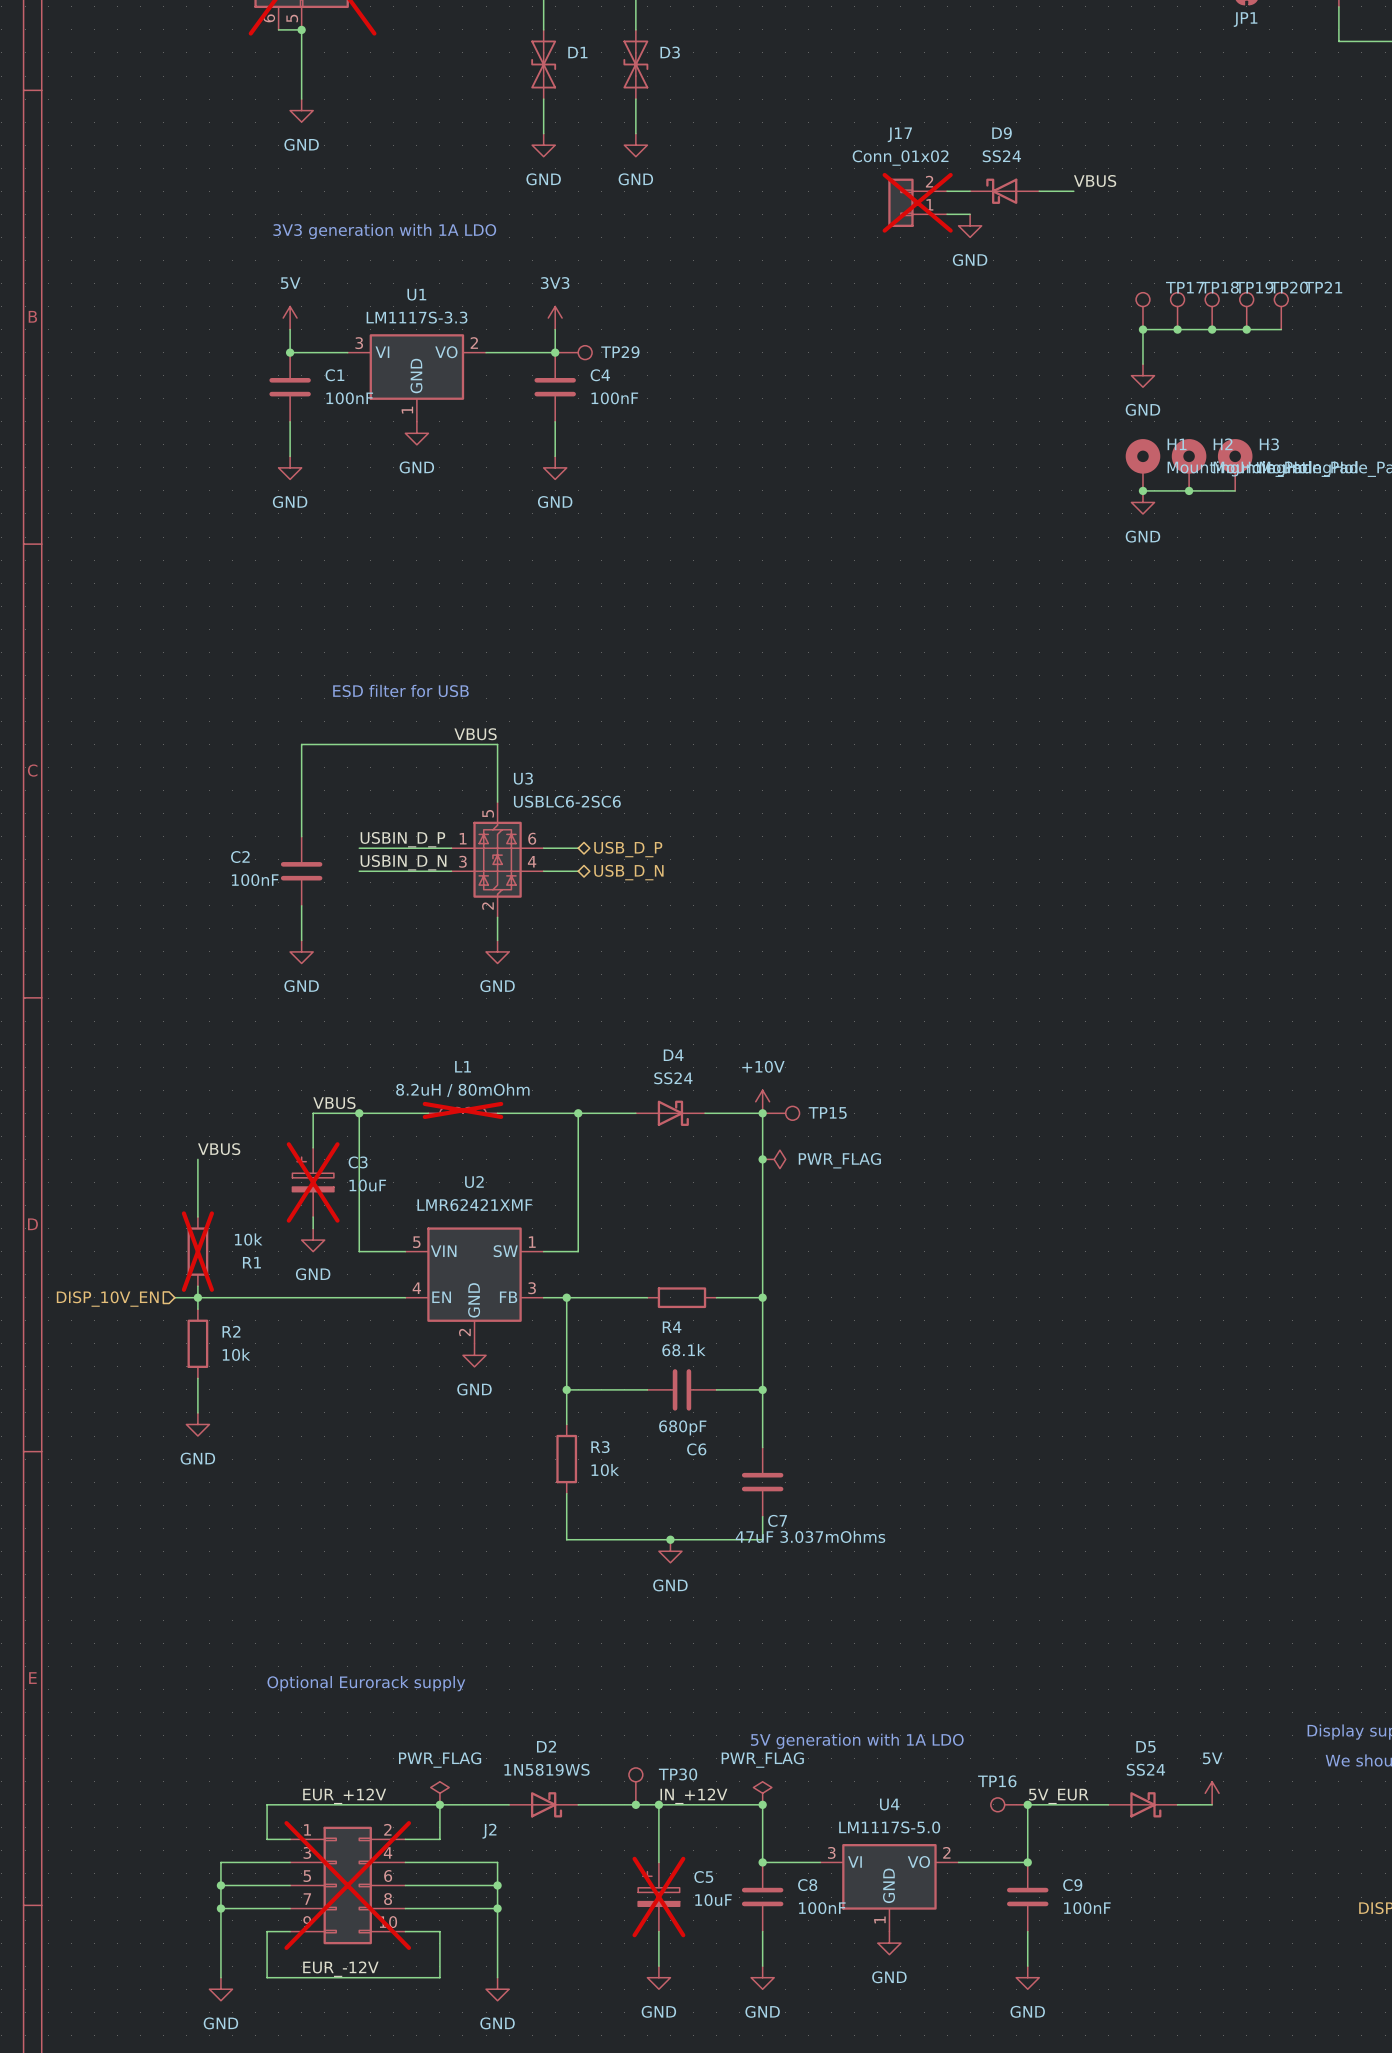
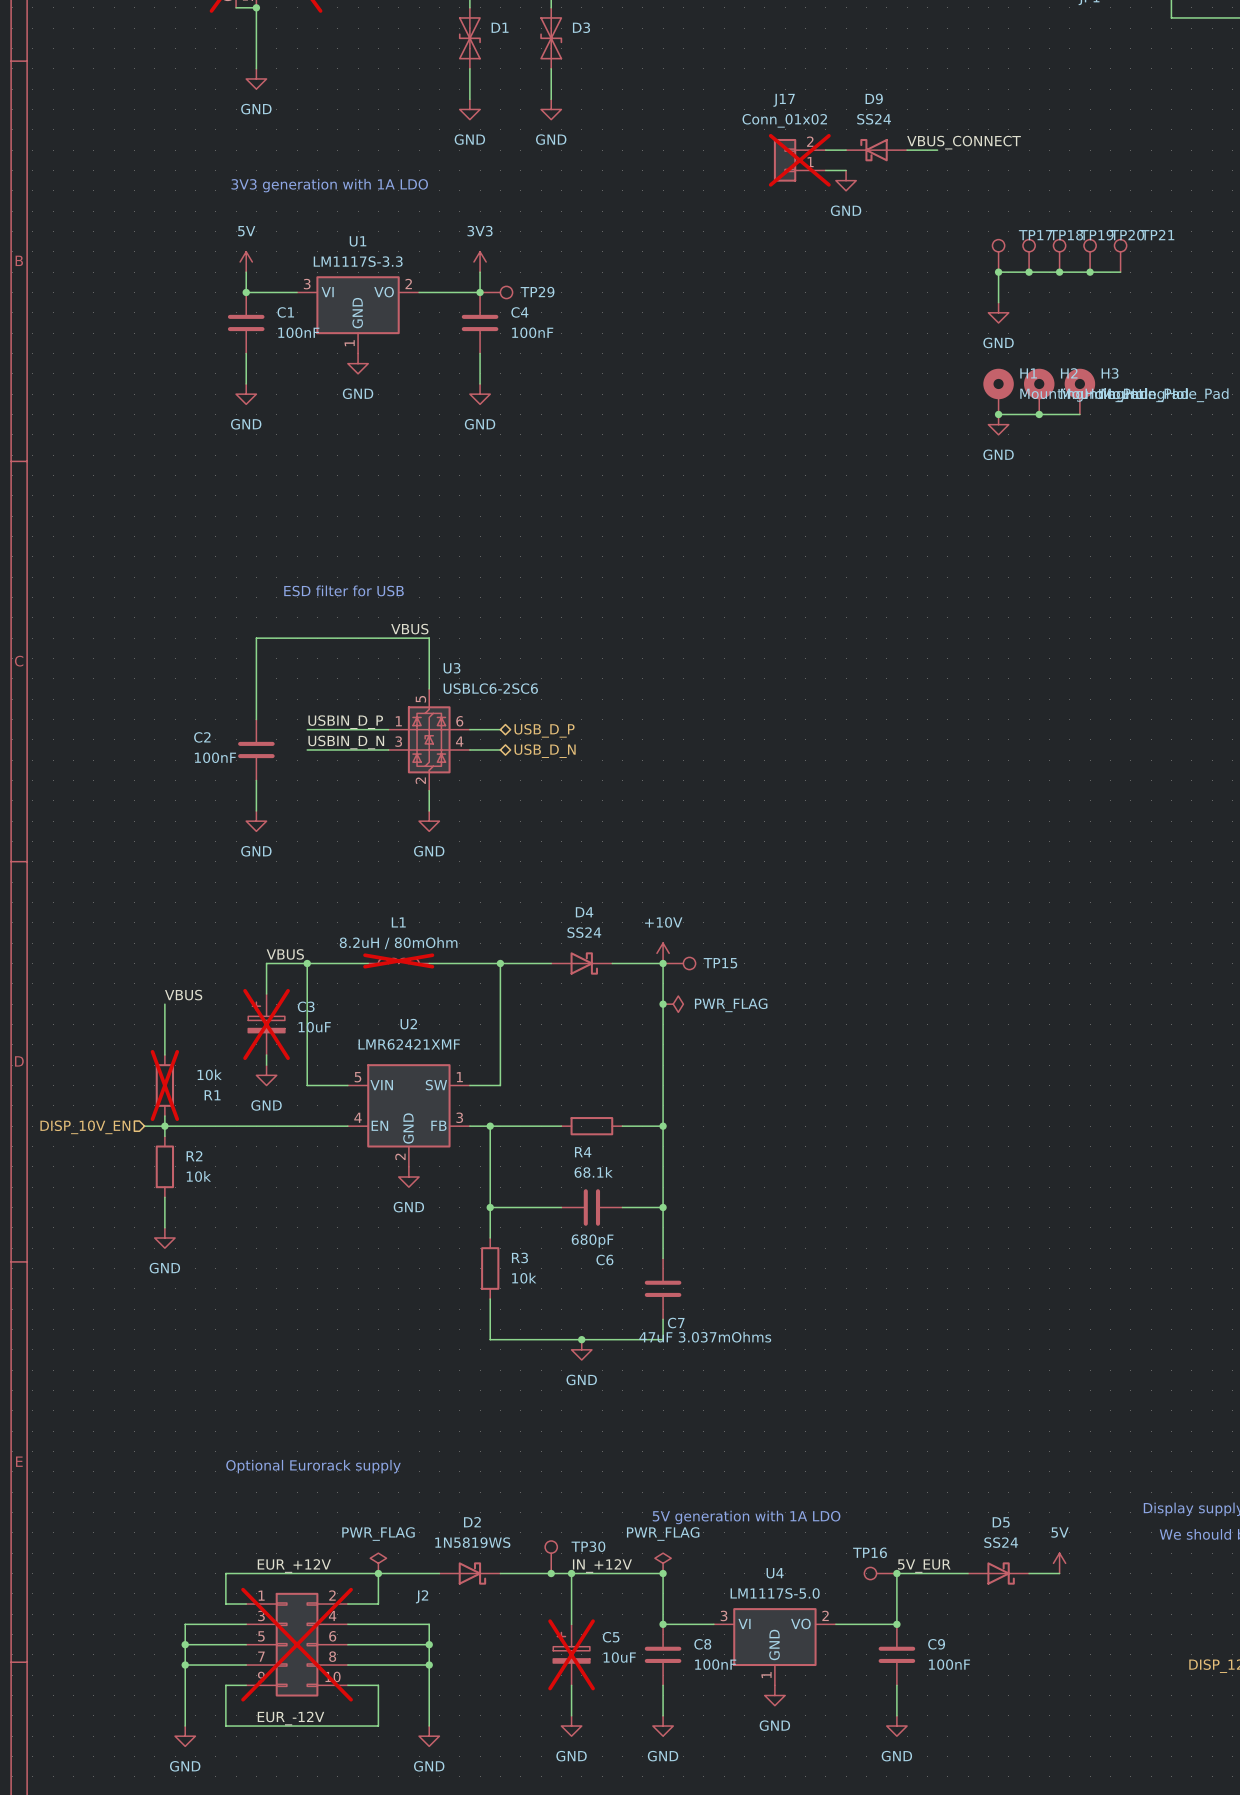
label: VBUS (1095, 181) -> none
label: none -> VBUS_CONNECT (964, 142)

